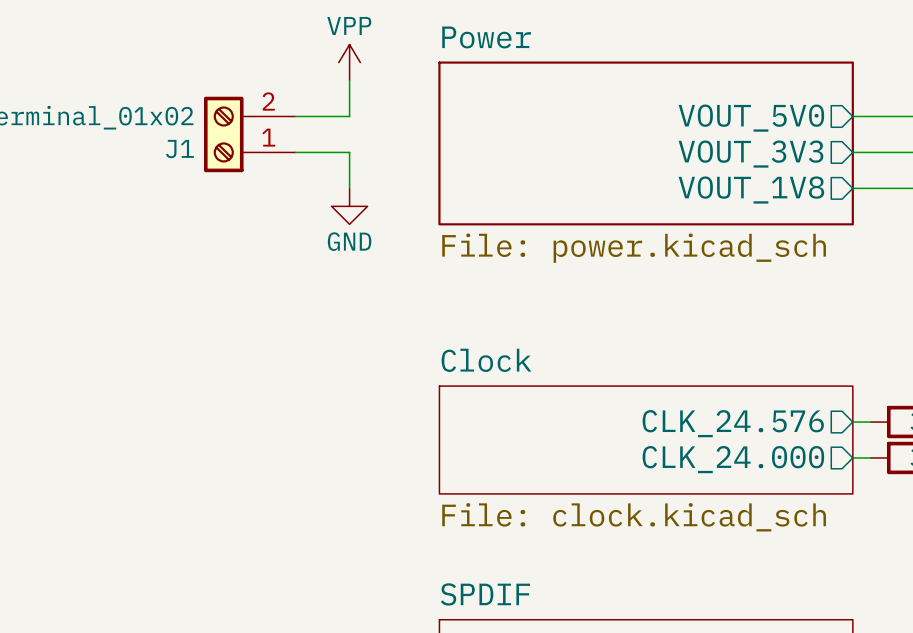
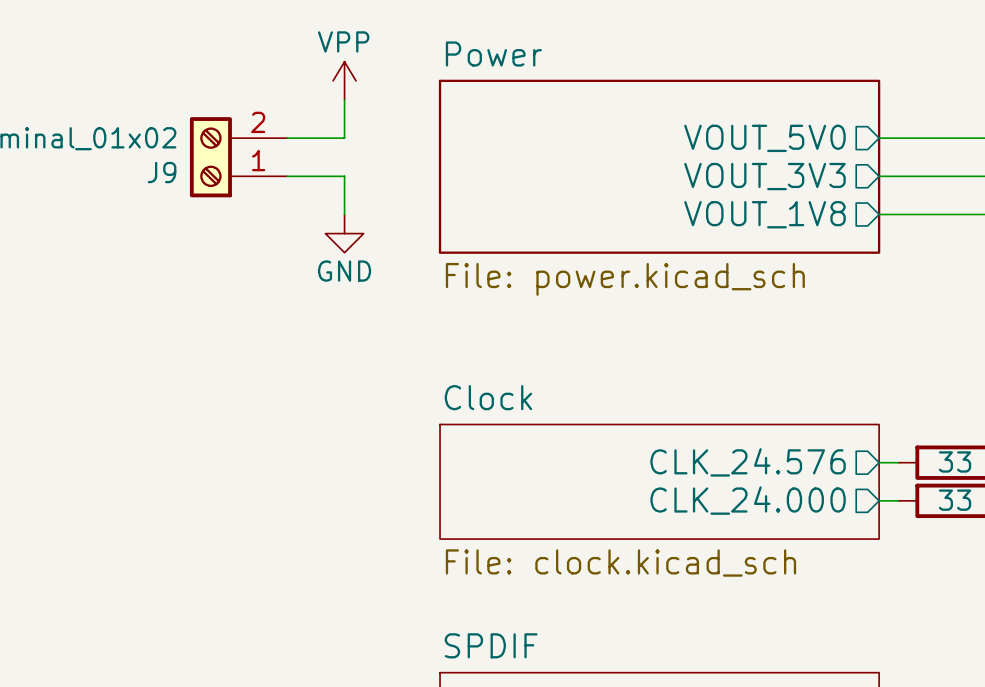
J1 name: J1 (179, 149) -> J9 (162, 172)

